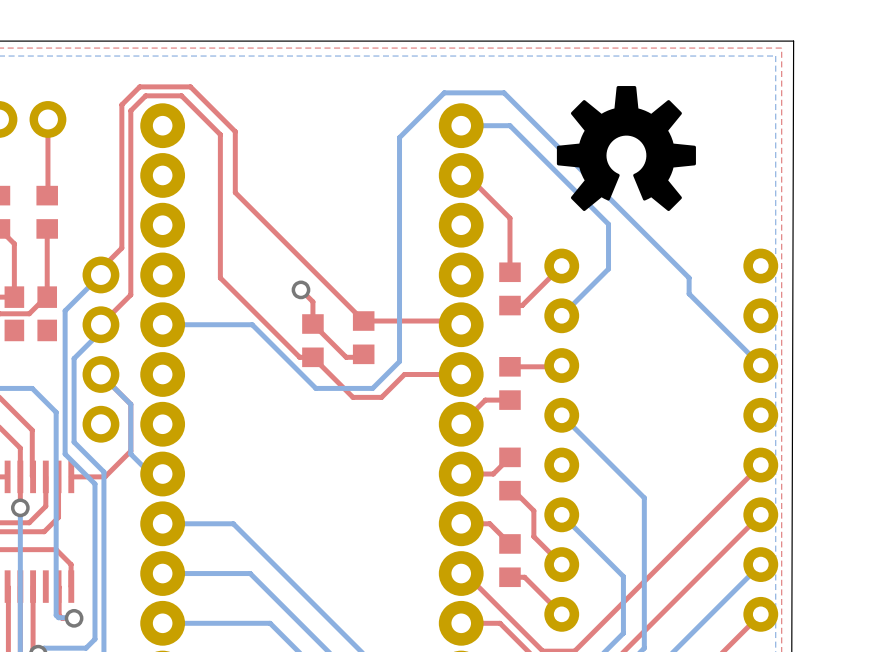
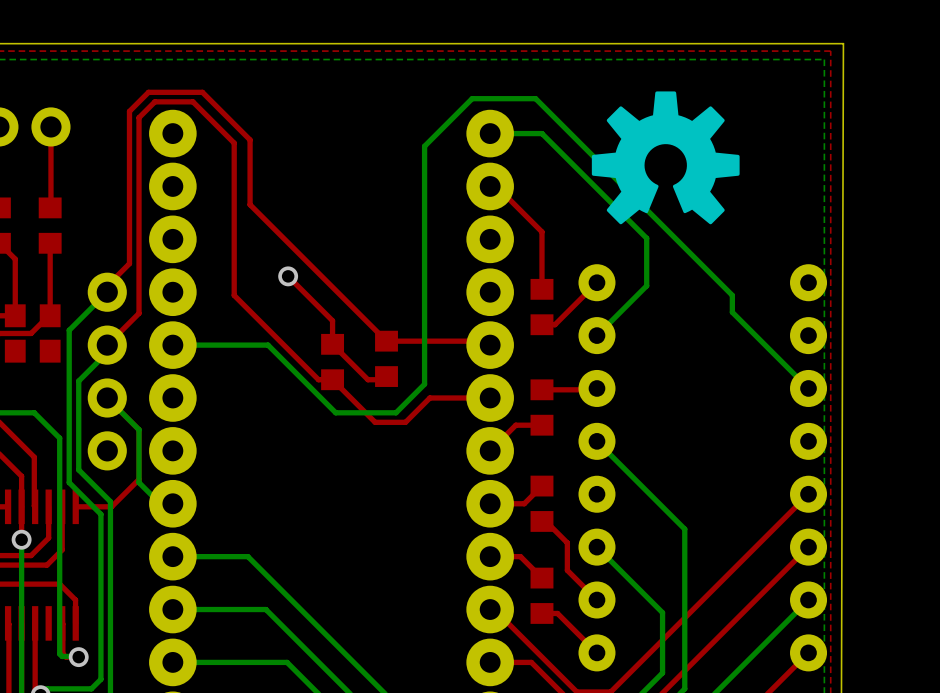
top track: none -> (288, 276) (319, 308)
via position: (300, 289) -> (288, 276)

